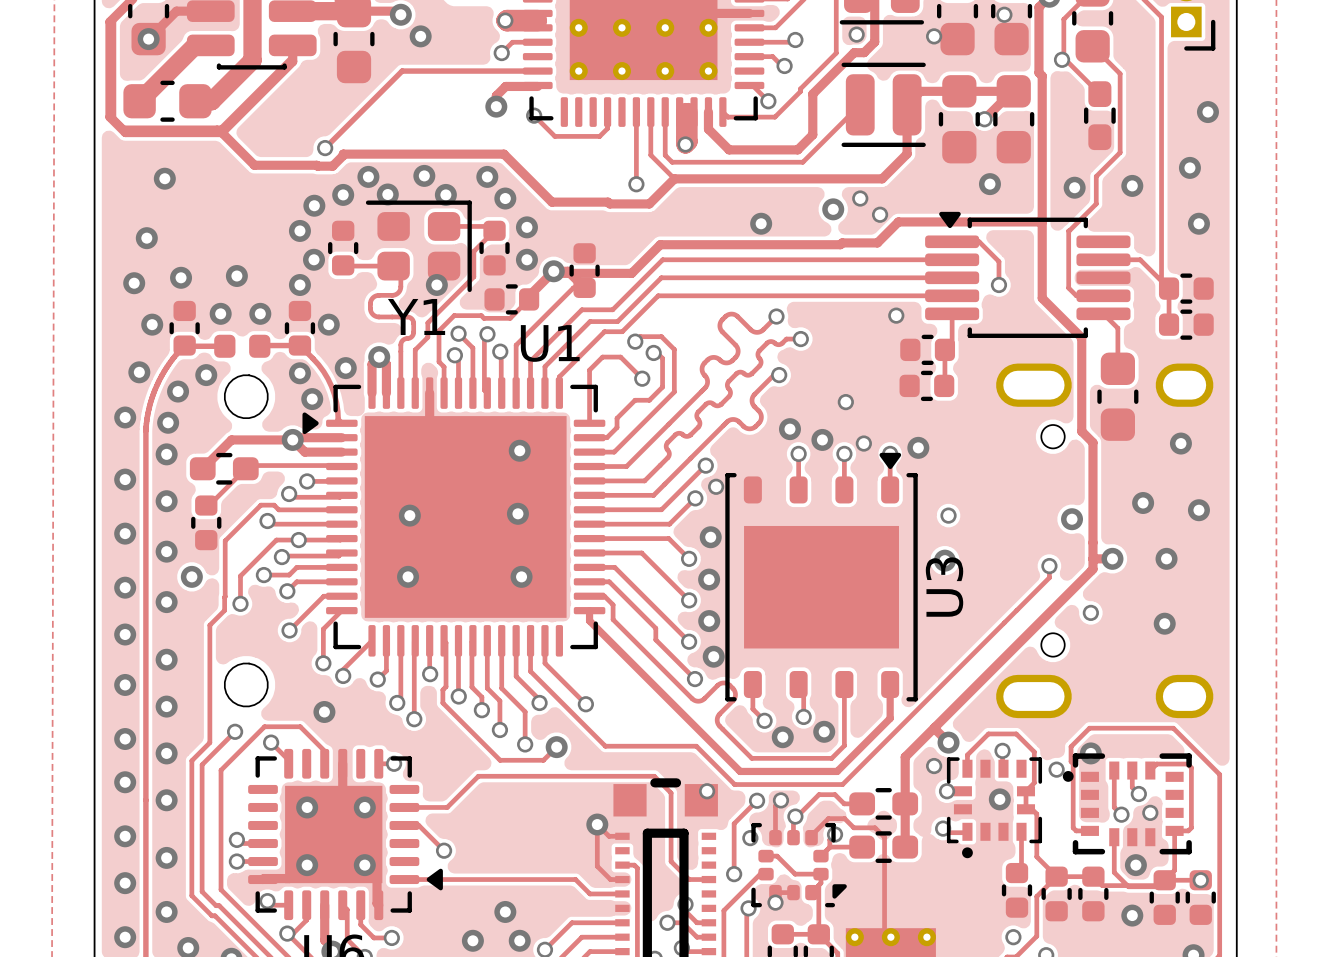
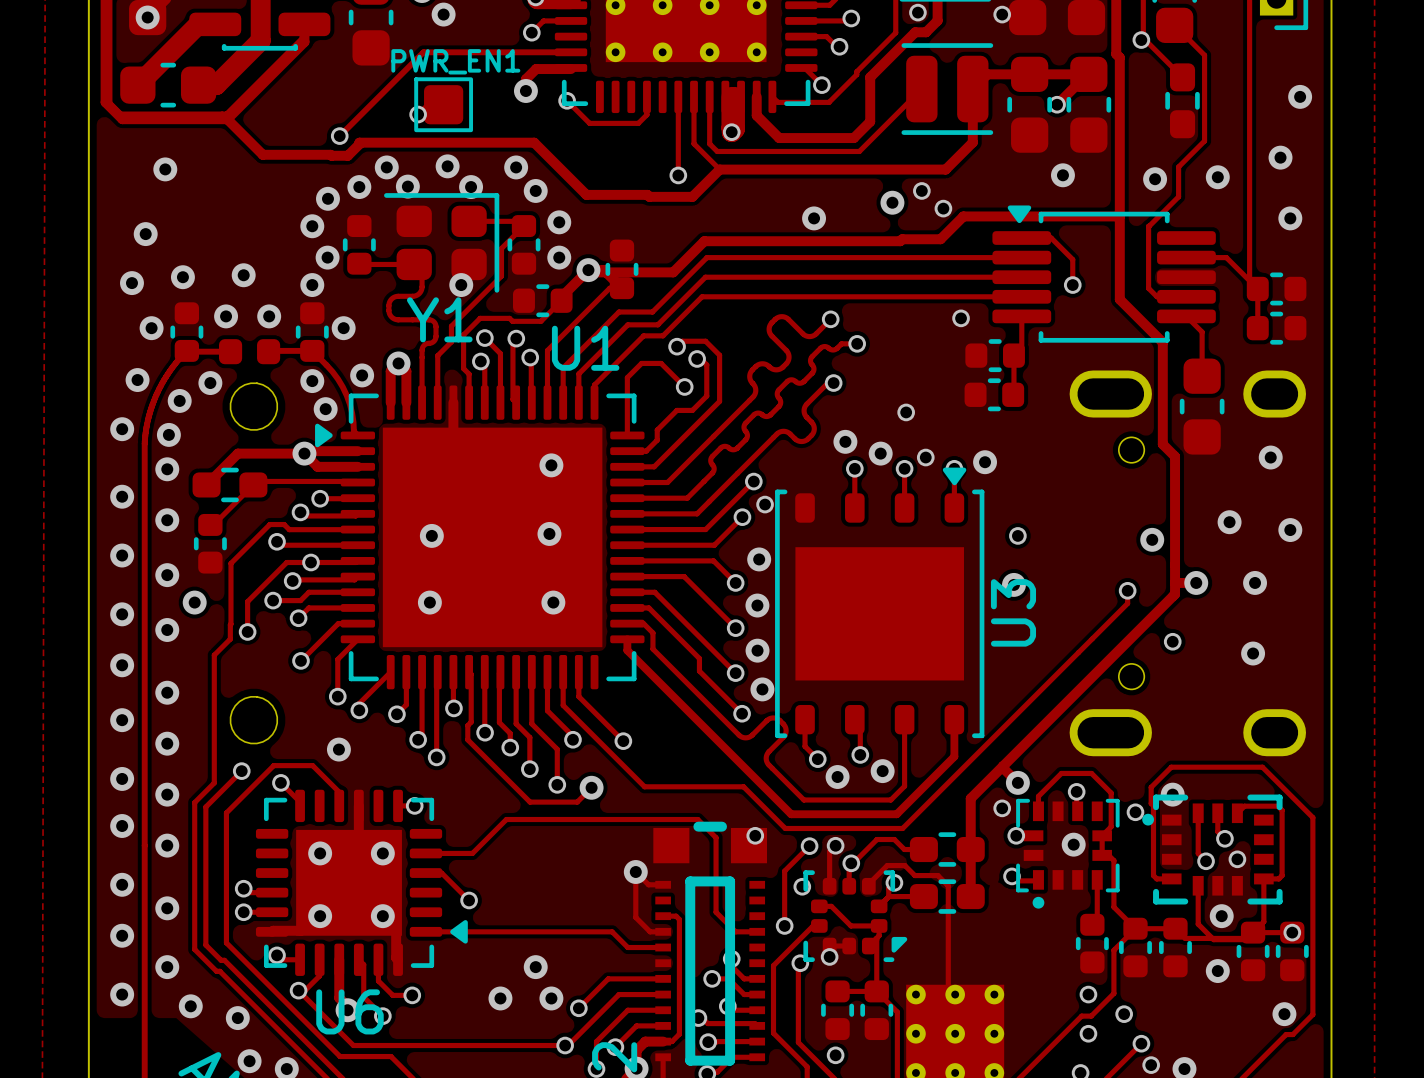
PWR_EN1: none -> (443, 104)
via: none -> (418, 114)

